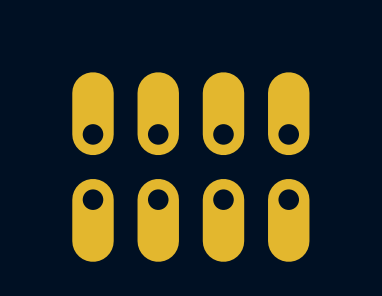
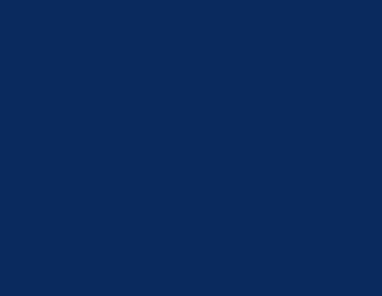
part: (190, 167) -> none

